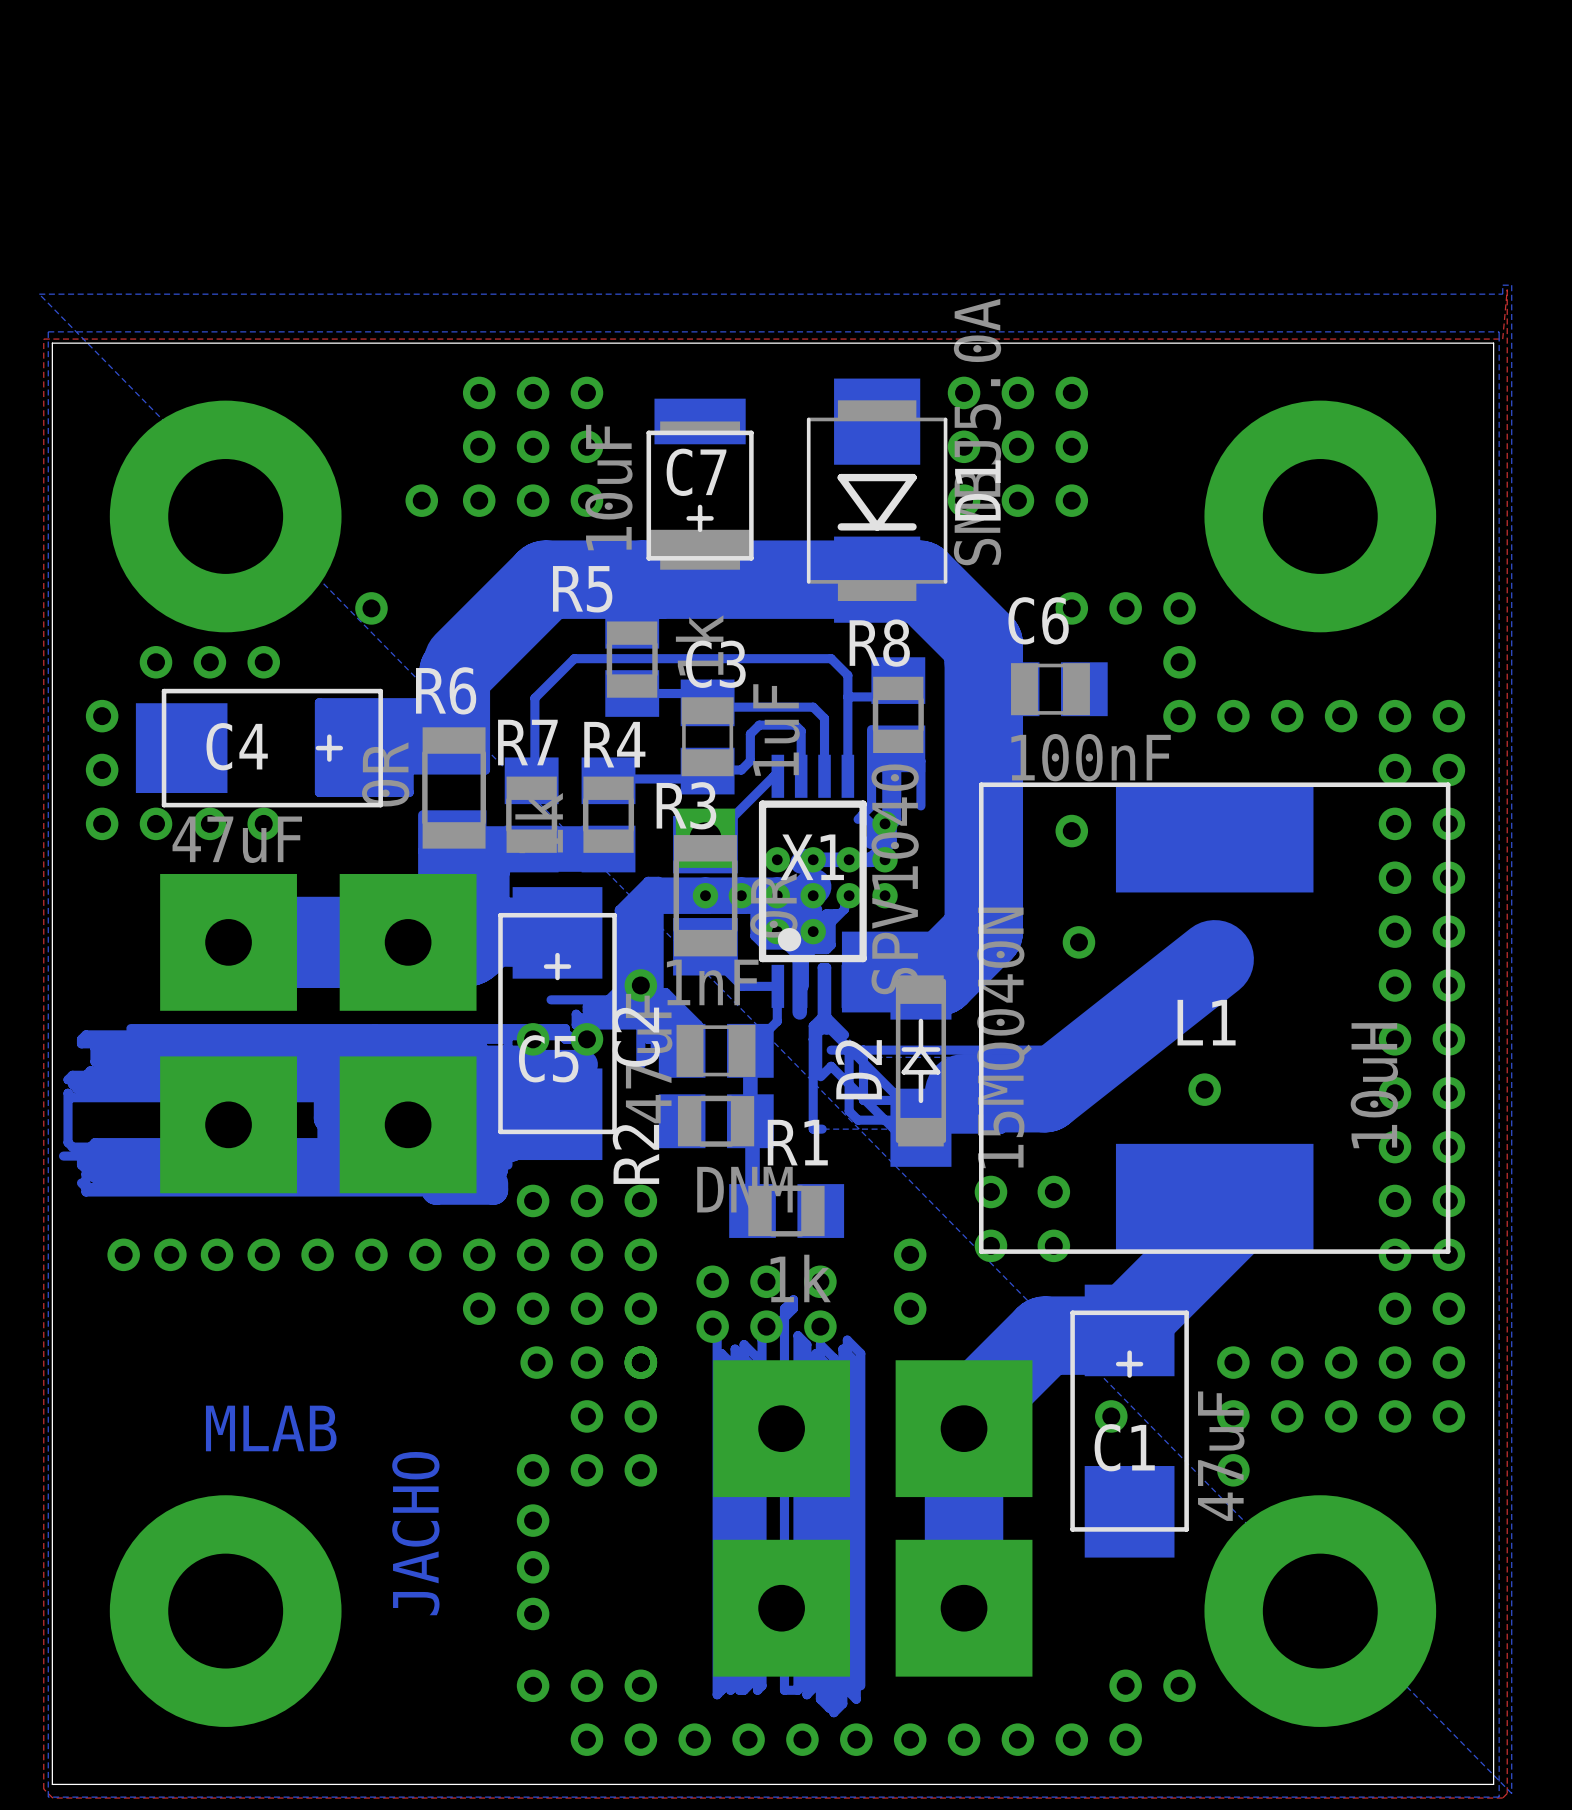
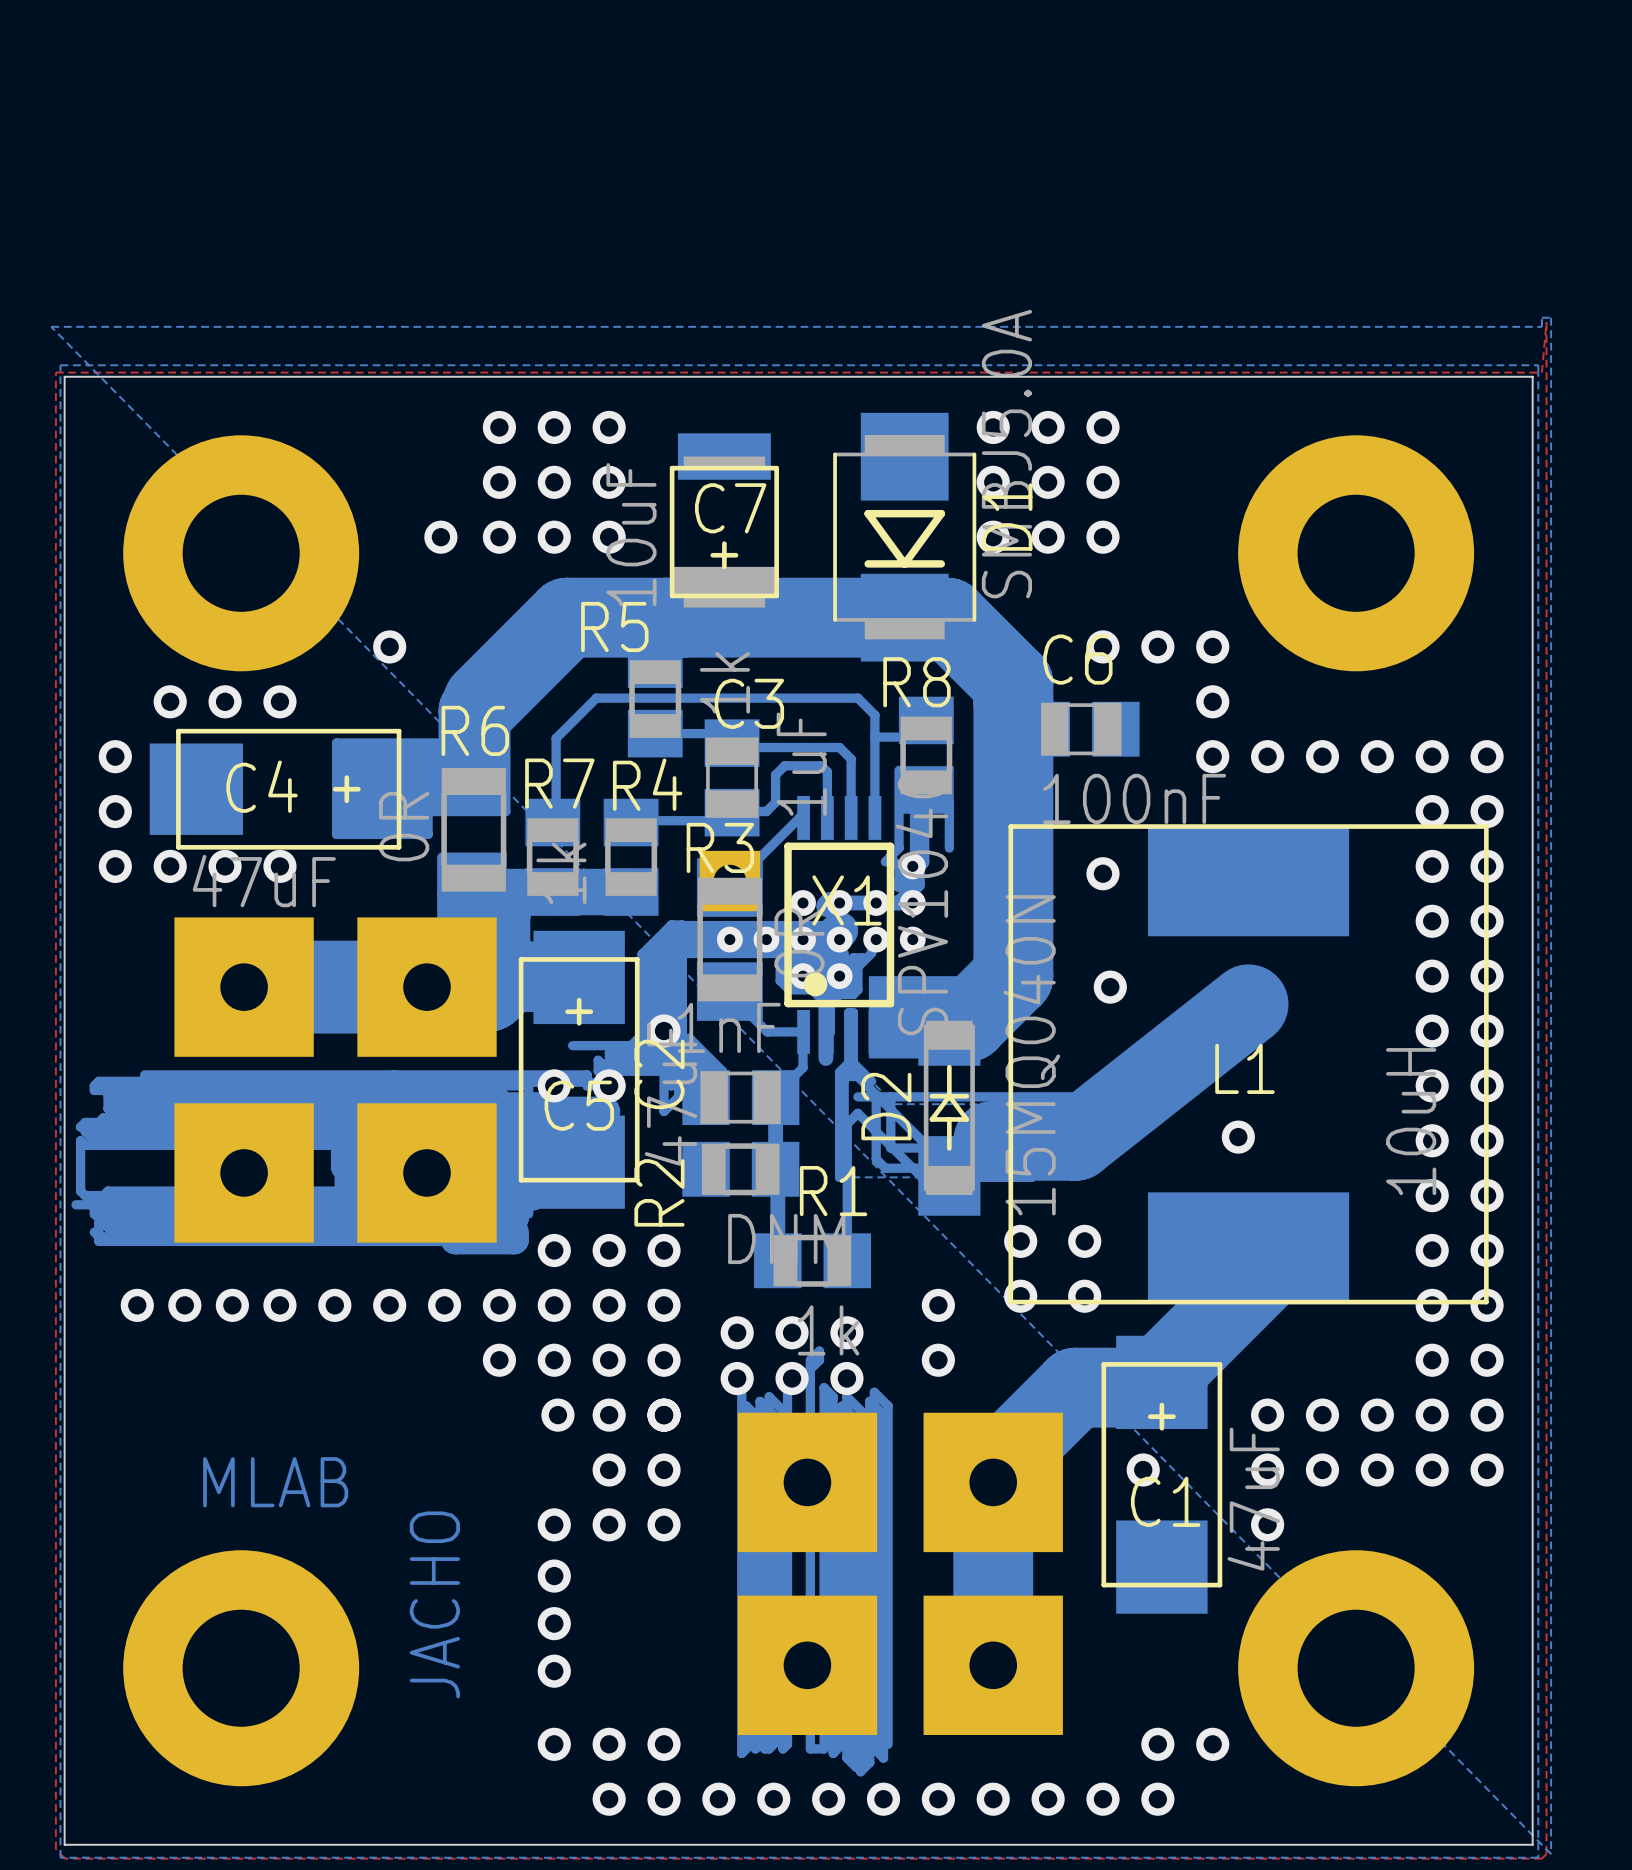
bottom track: none -> (847, 1123) (847, 1260)

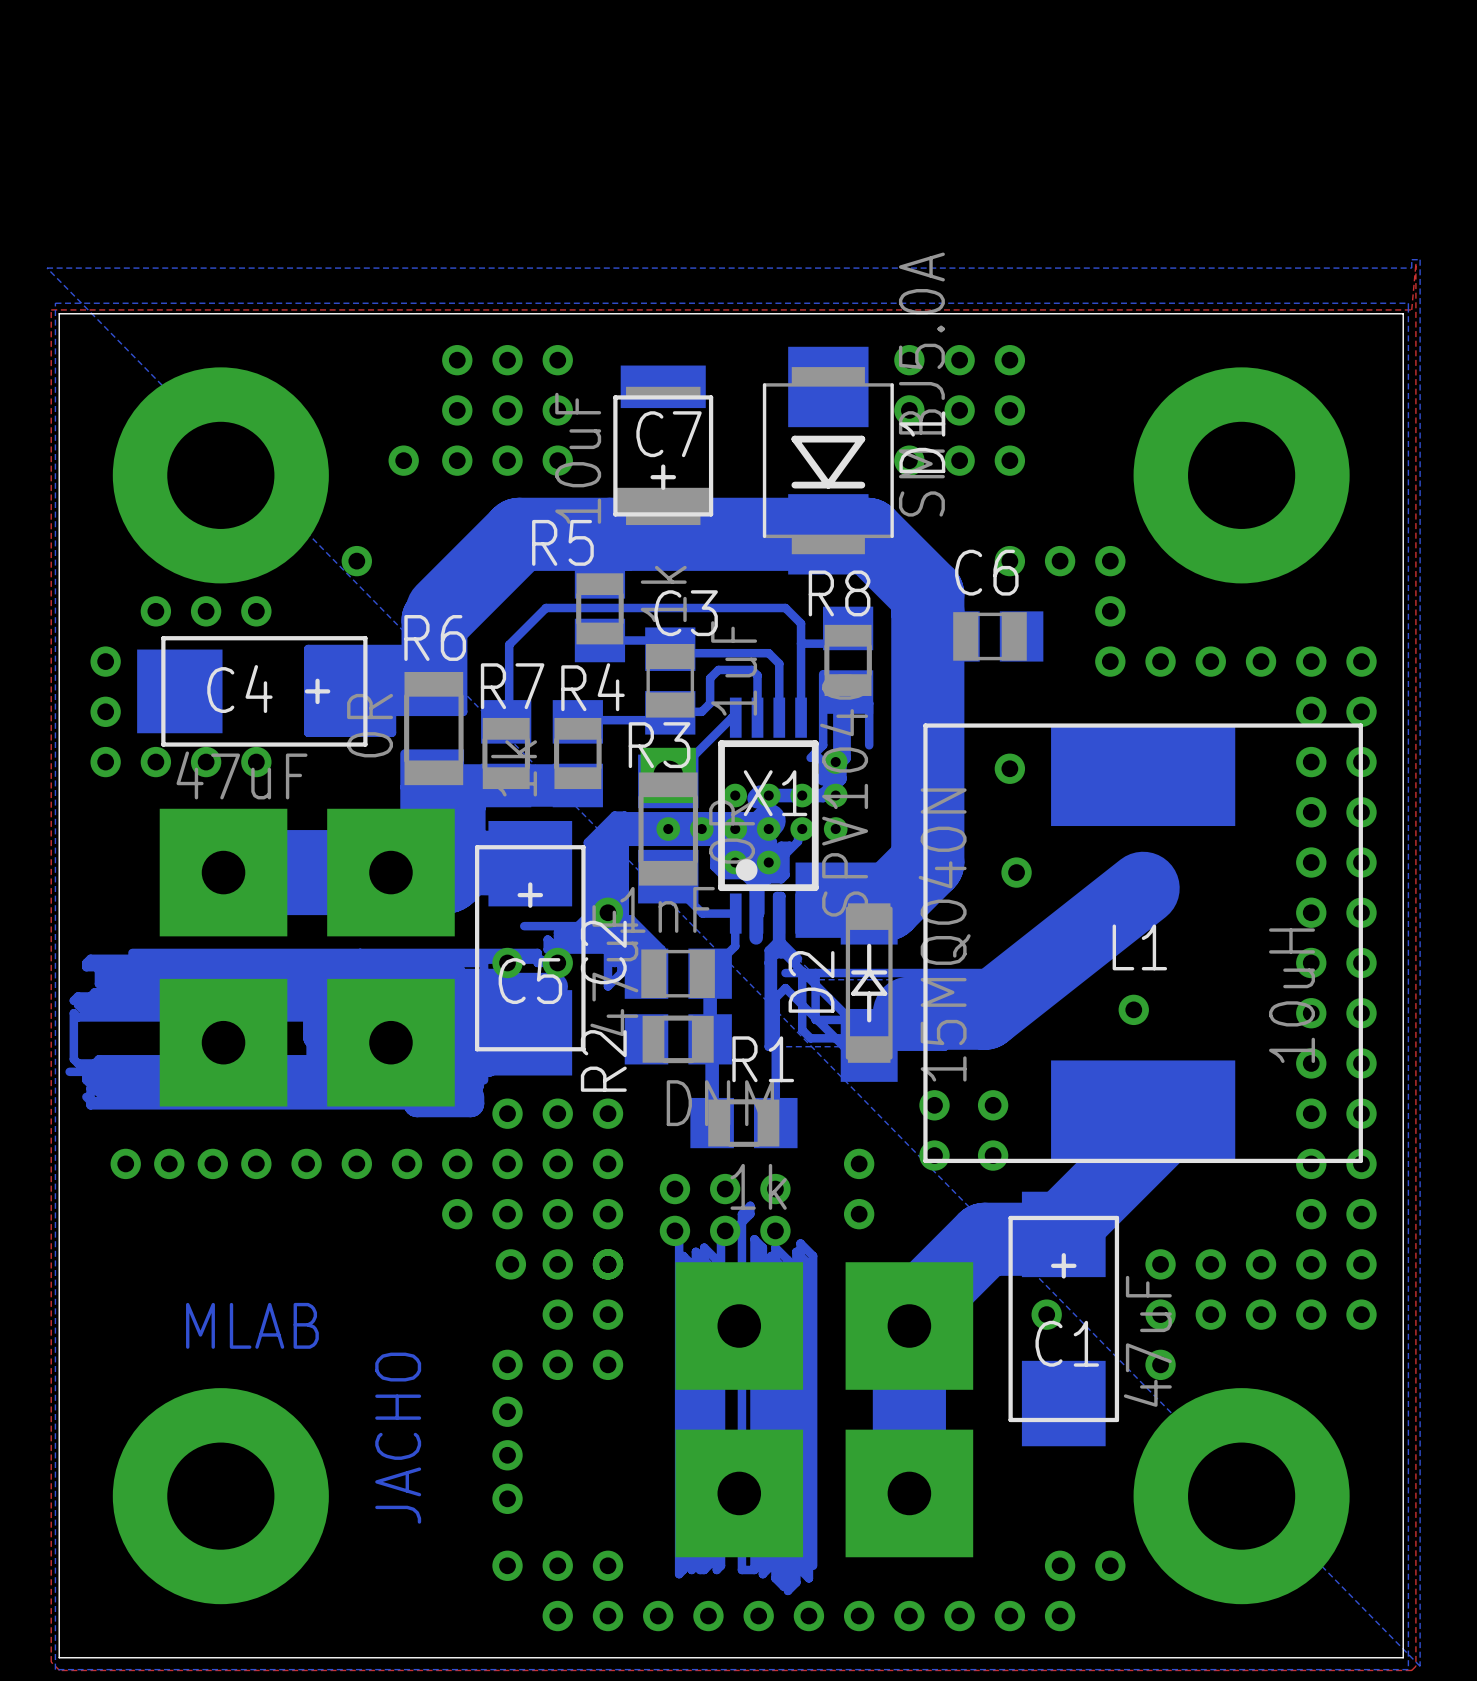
C6 value: 100nF (1134, 798) -> none

